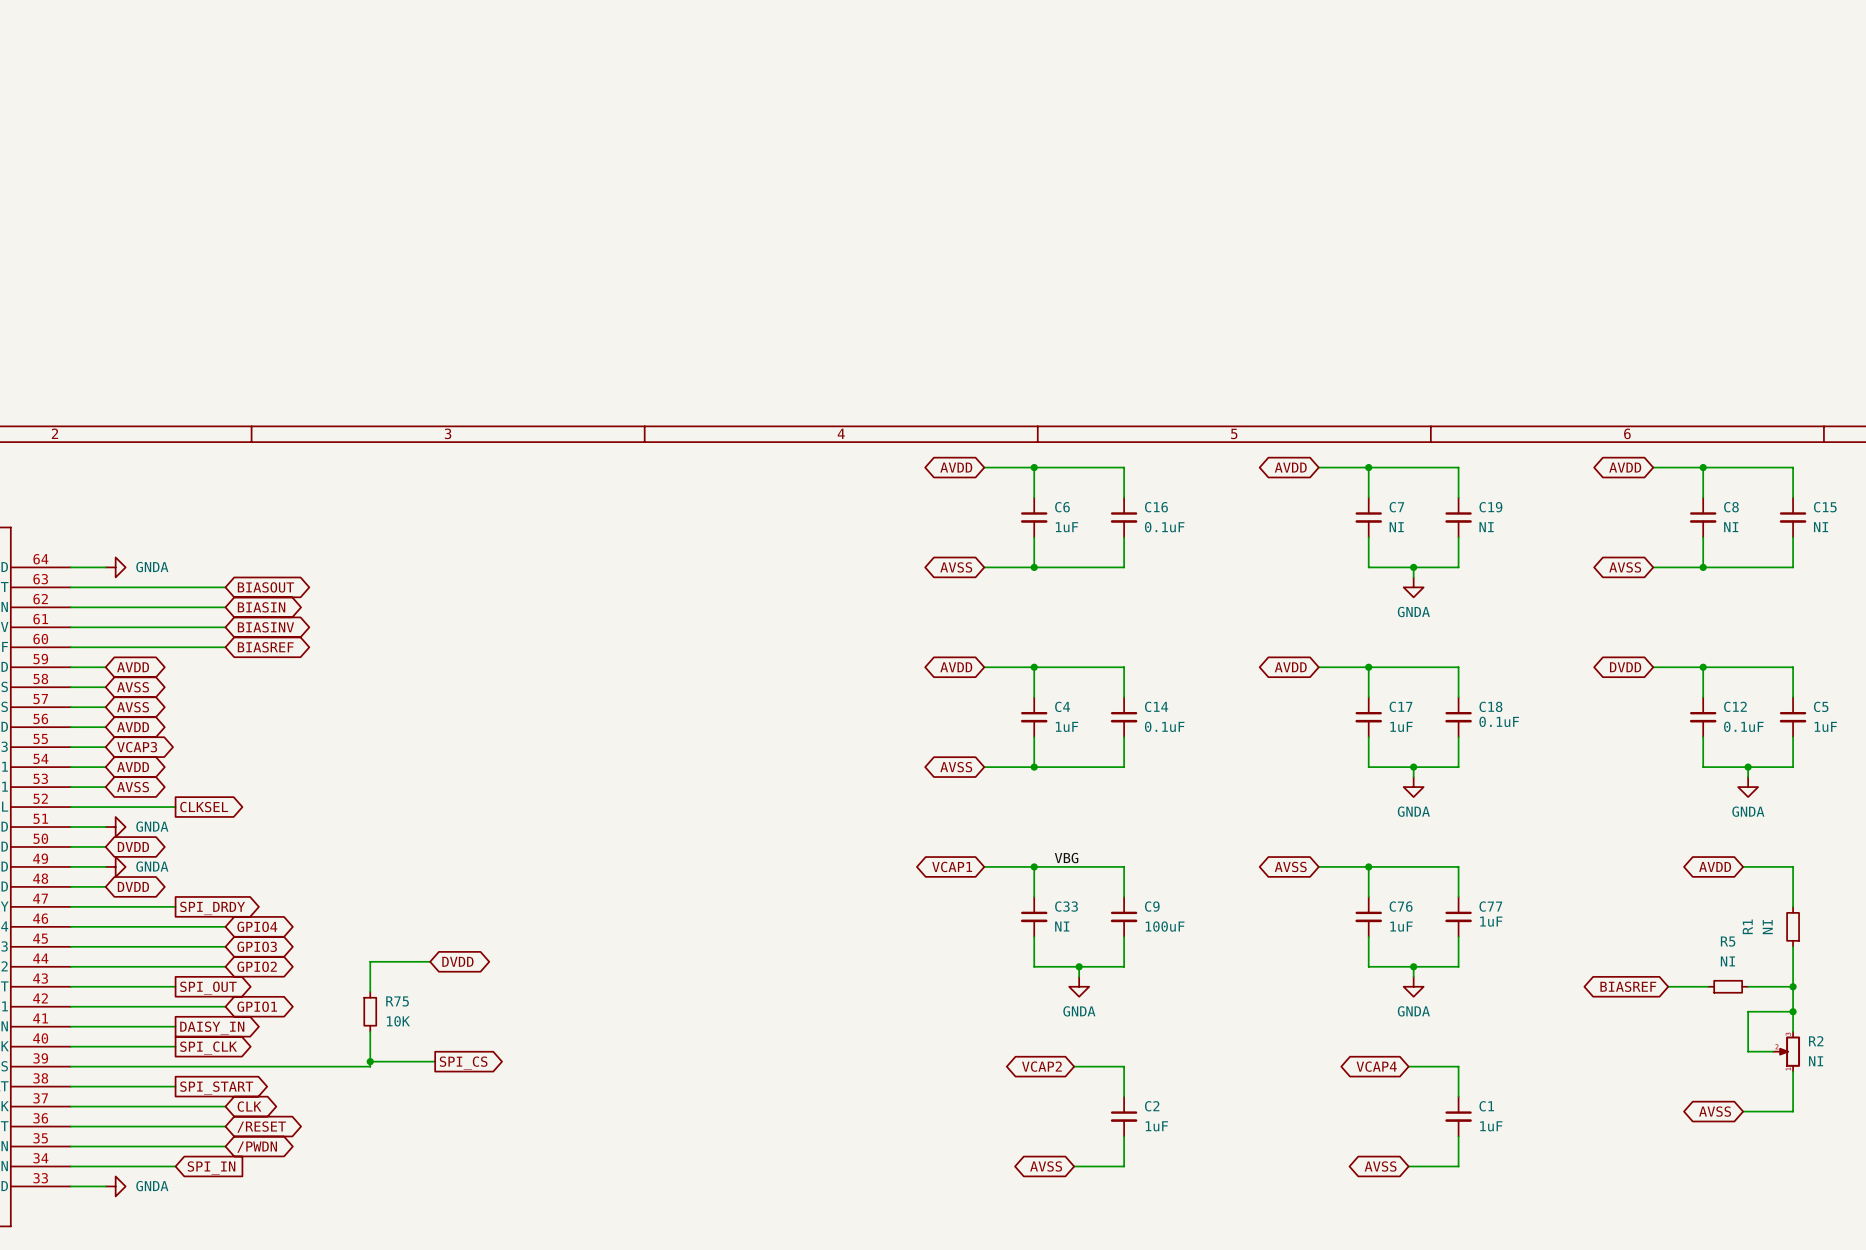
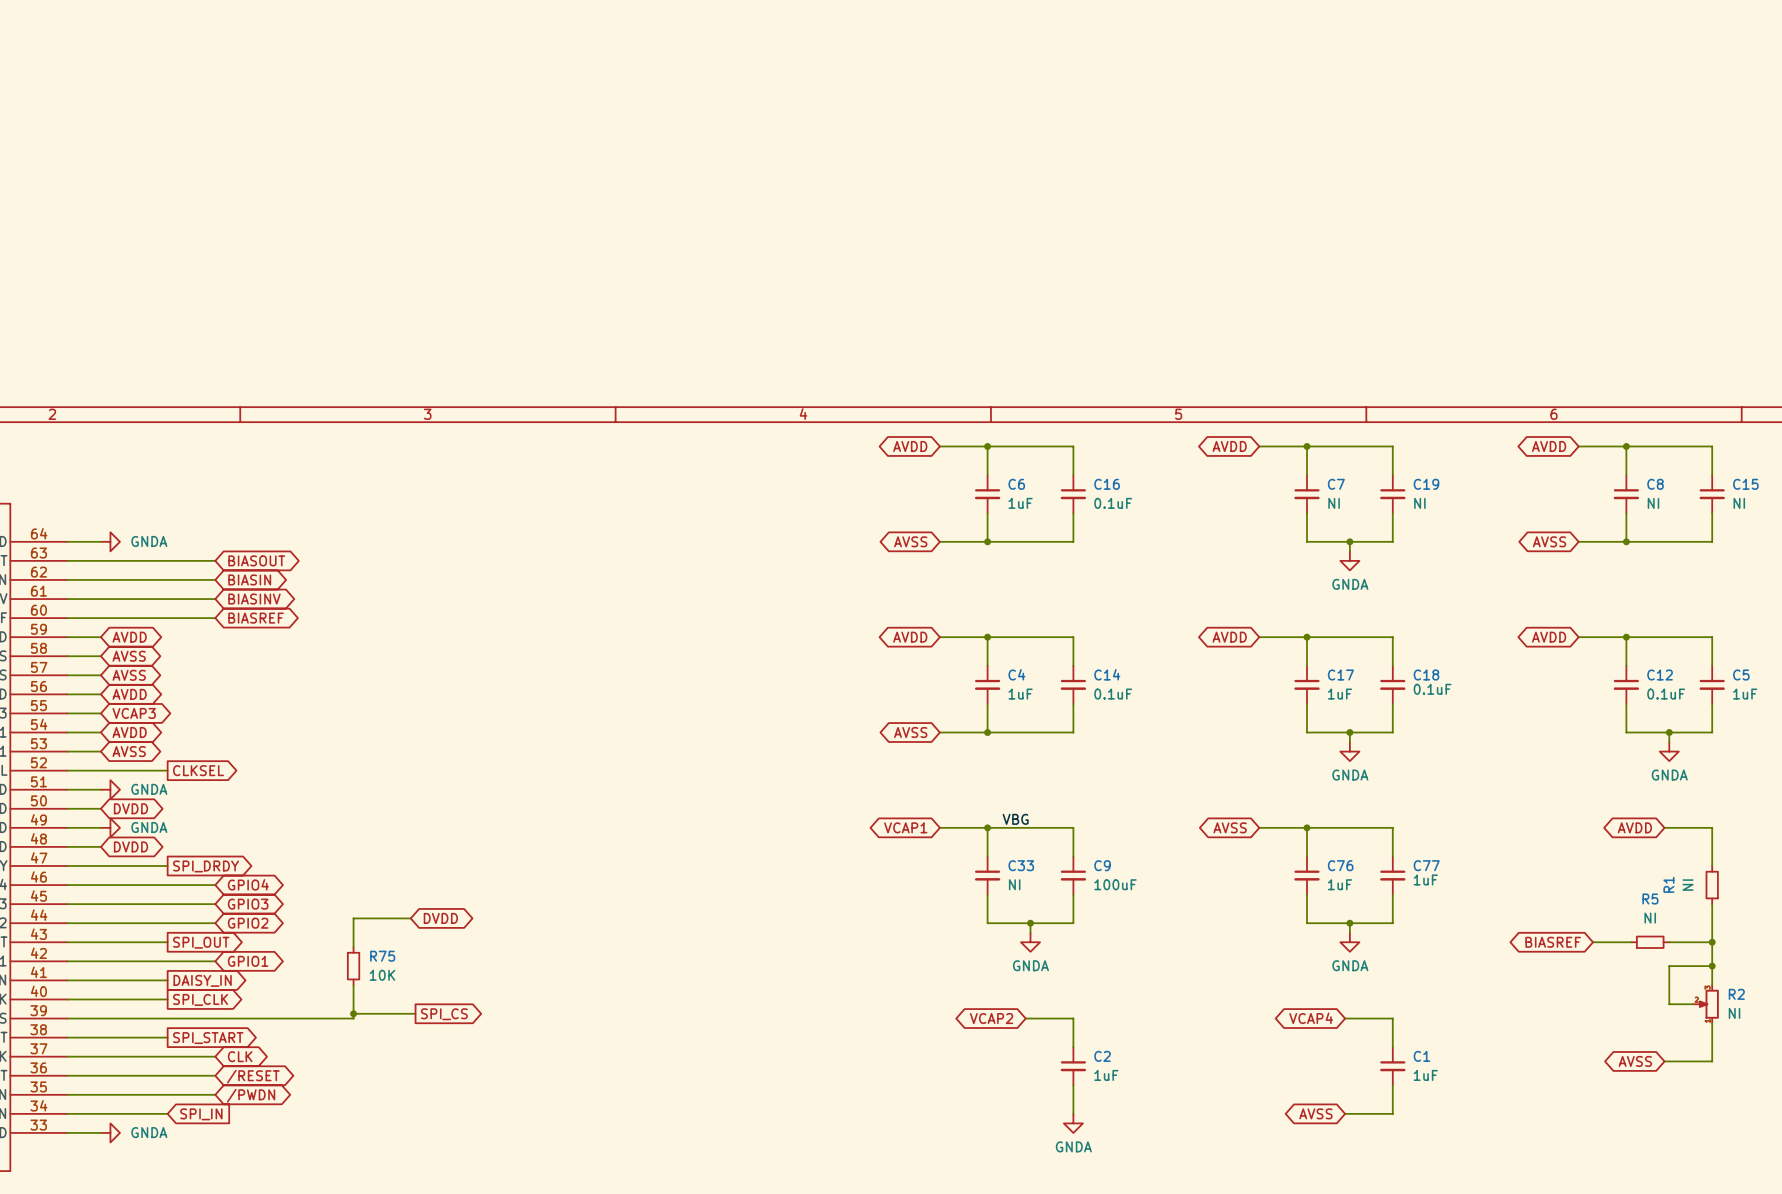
global label: DVDD (1625, 667) -> AVDD (1549, 637)
global label: AVSS (1046, 1166) -> none
wire: (1074, 1166) (1124, 1166) -> none
power symbol: none -> GNDA (1073, 1123)

